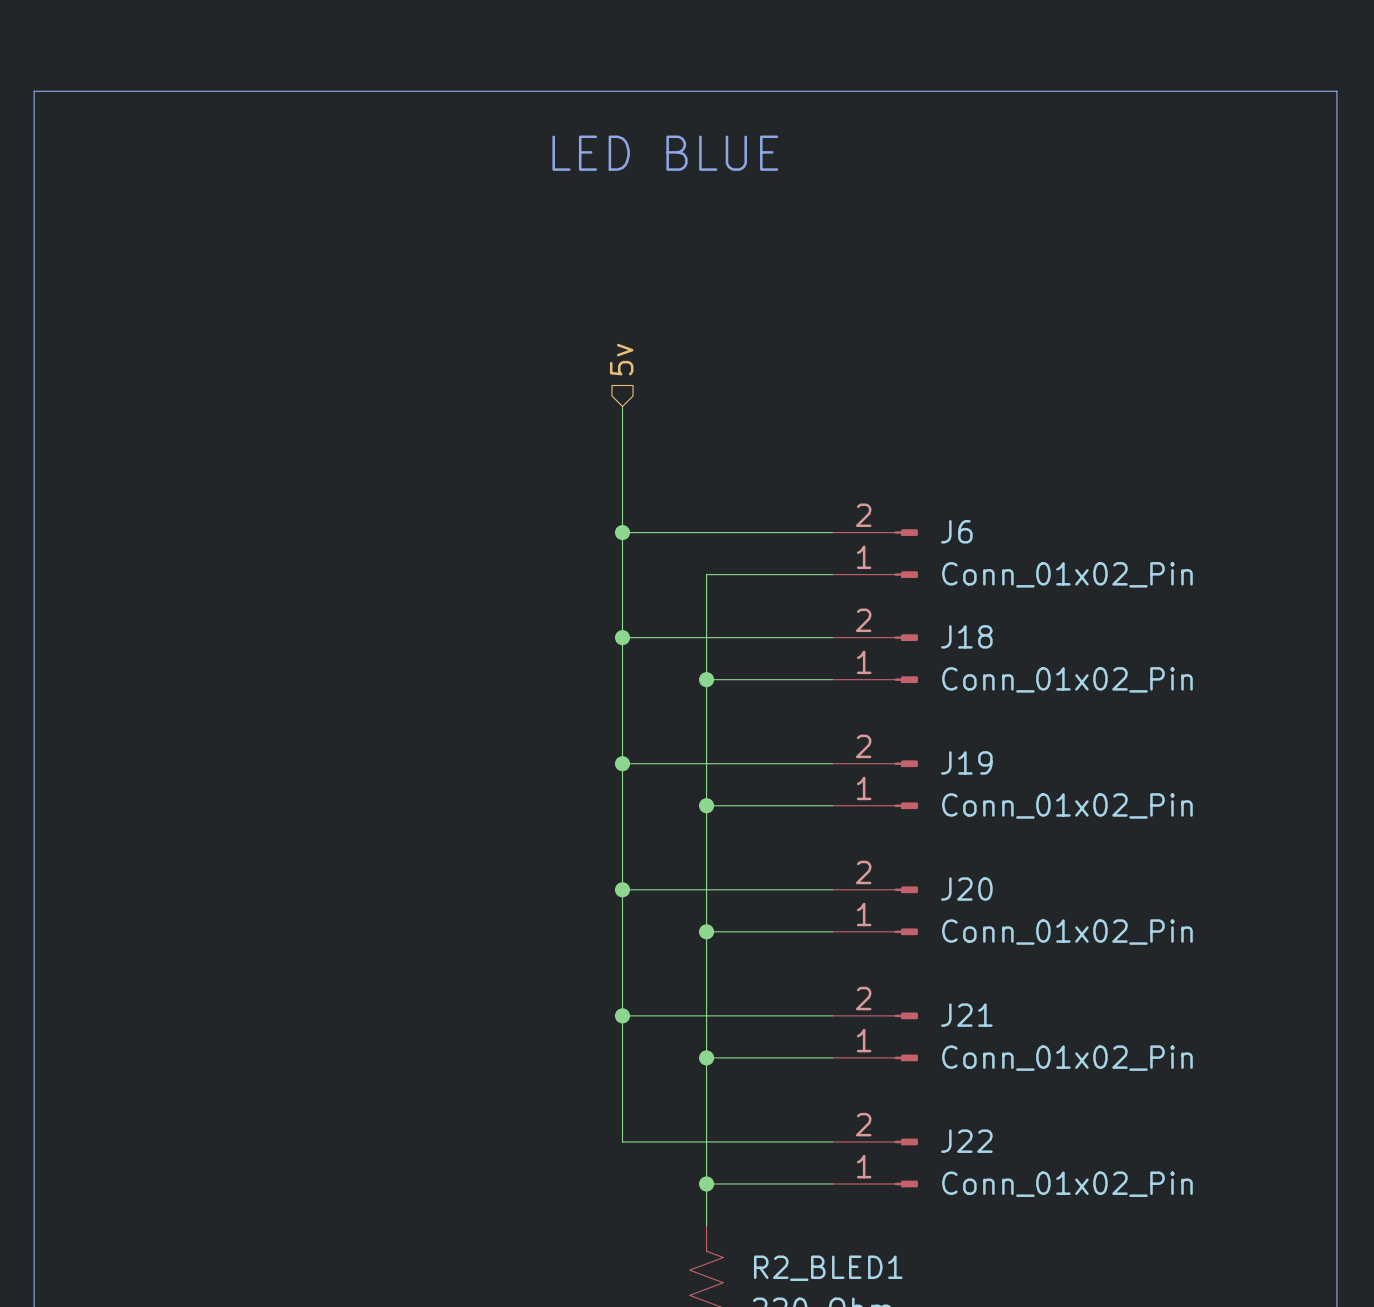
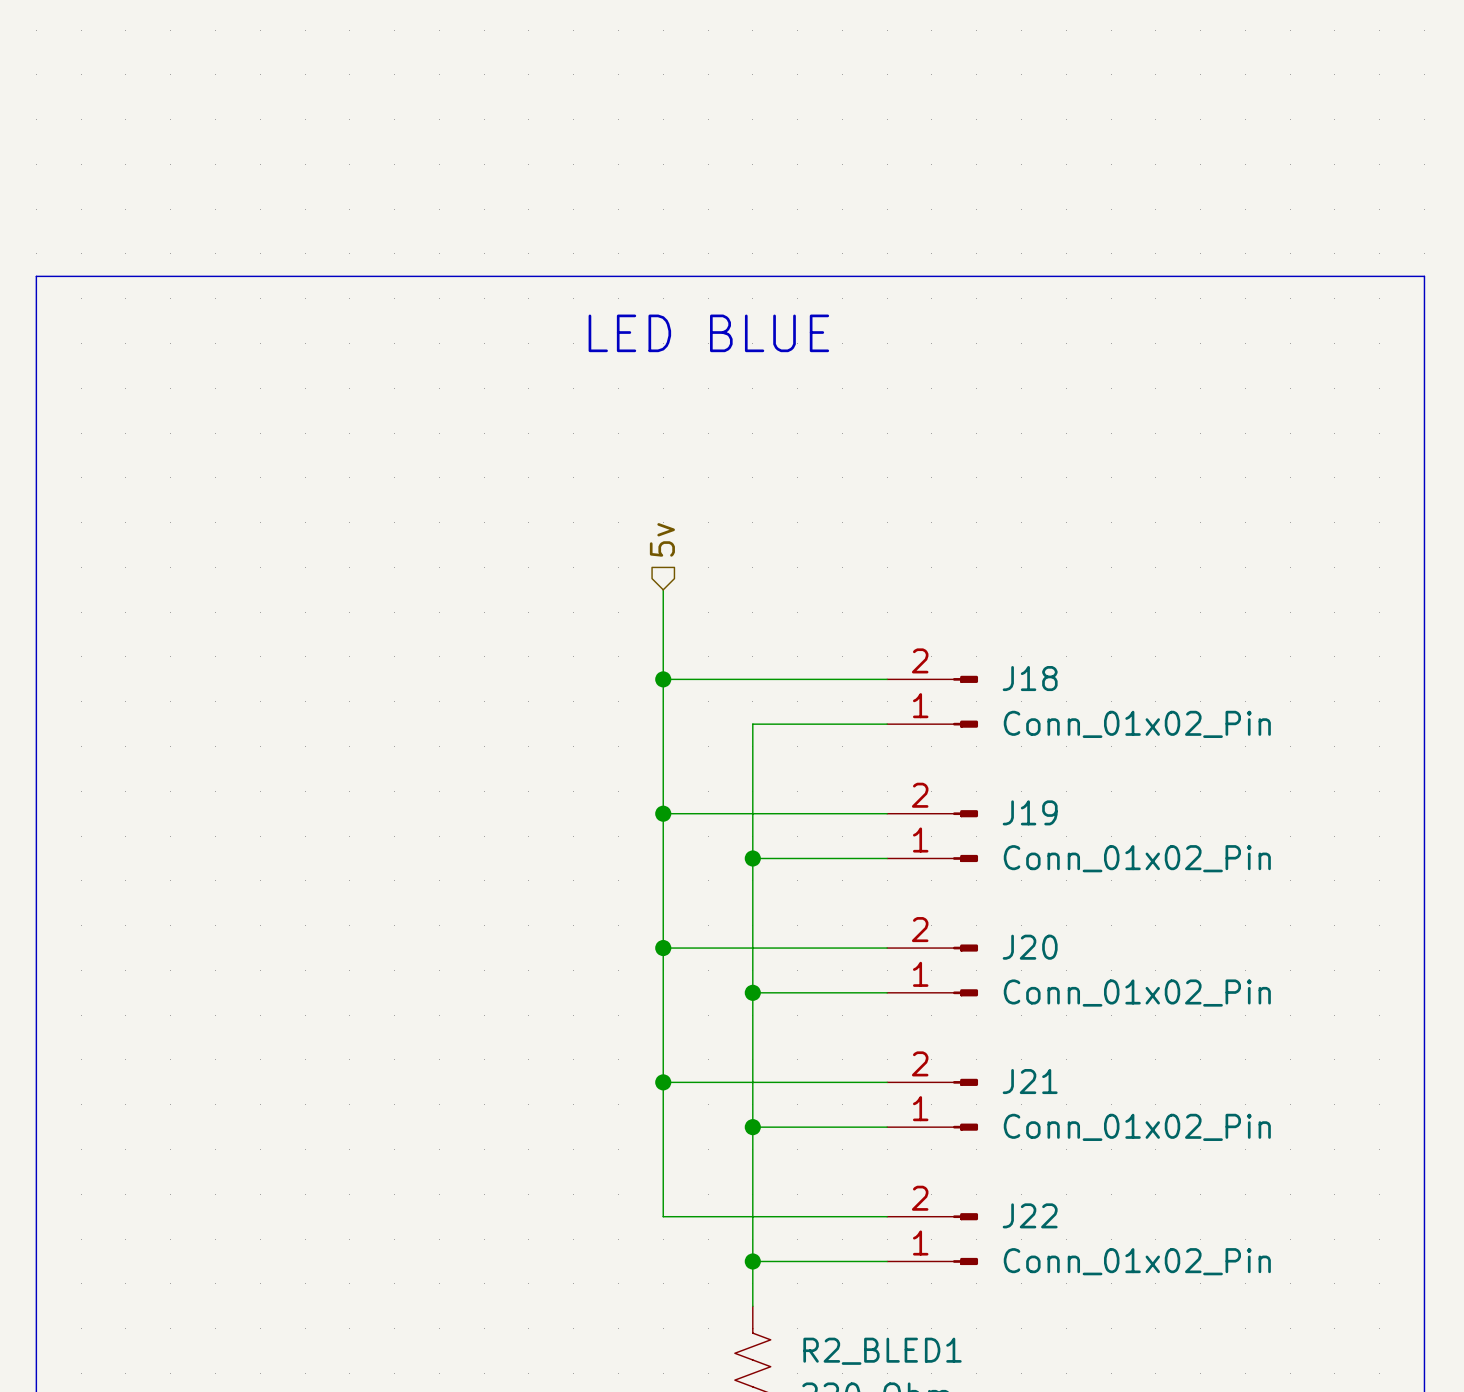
text position: LED BLUE (665, 153) -> LED BLUE (708, 333)
line: (34, 259) (34, 91) (1336, 91) (1336, 259) -> (36, 276) (1424, 276)
hierarchical label position: 5v (621, 359) -> 5v (662, 539)
wire: (622, 406) (622, 553) -> none
wire: (622, 532) (832, 532) -> none
junction: (622, 532) -> none
J6: Conn_01x02_Pin (875, 553) -> none
wire: (832, 574) (706, 574) (706, 679) -> none
junction: (706, 679) -> none

